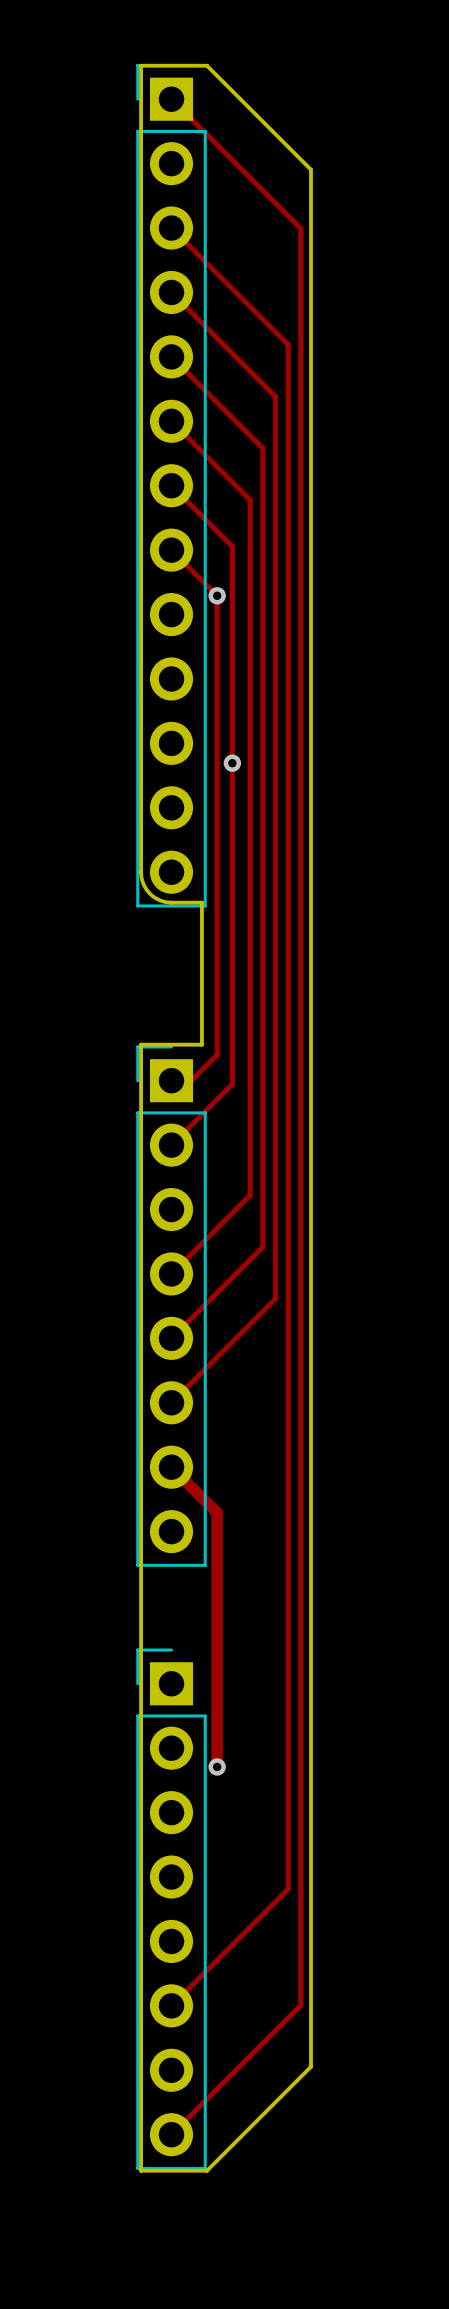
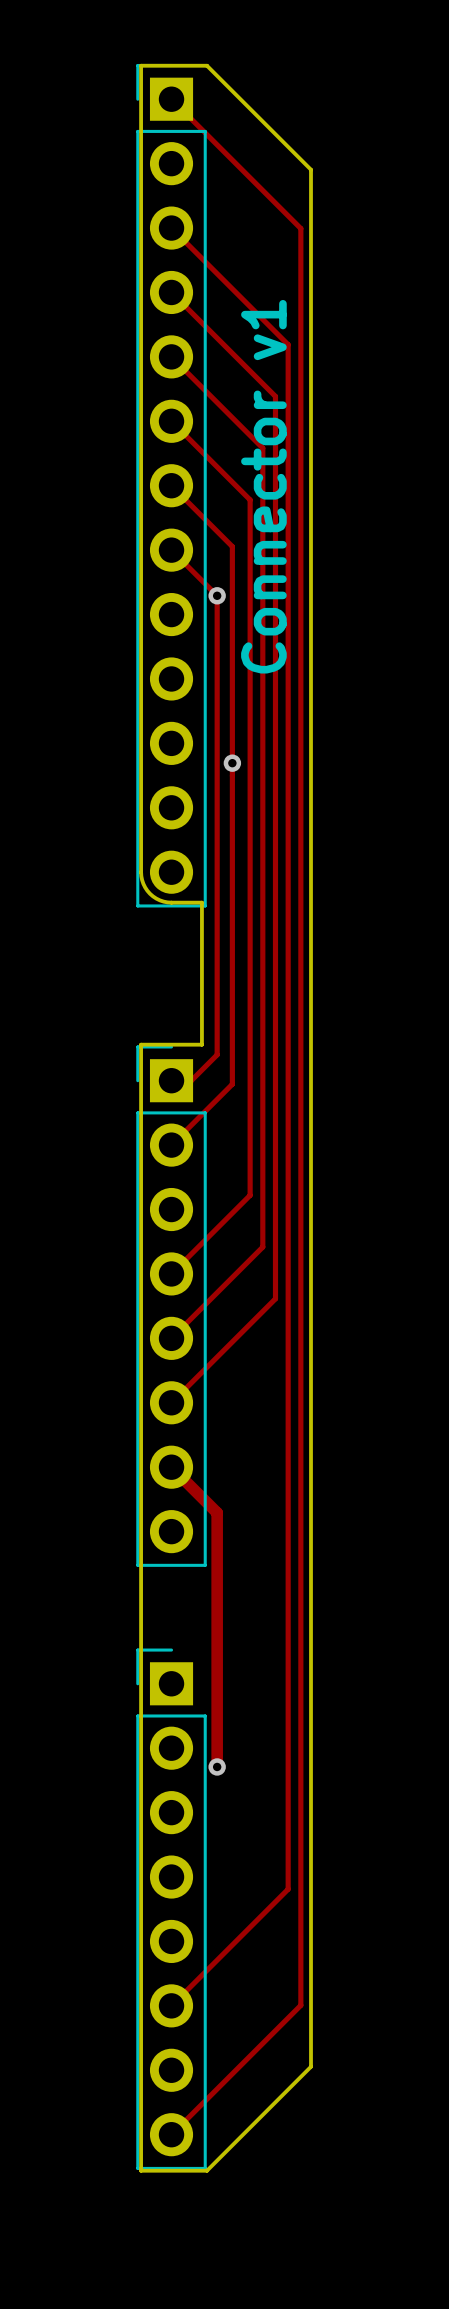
text: none -> Connector v1 (263, 486)

